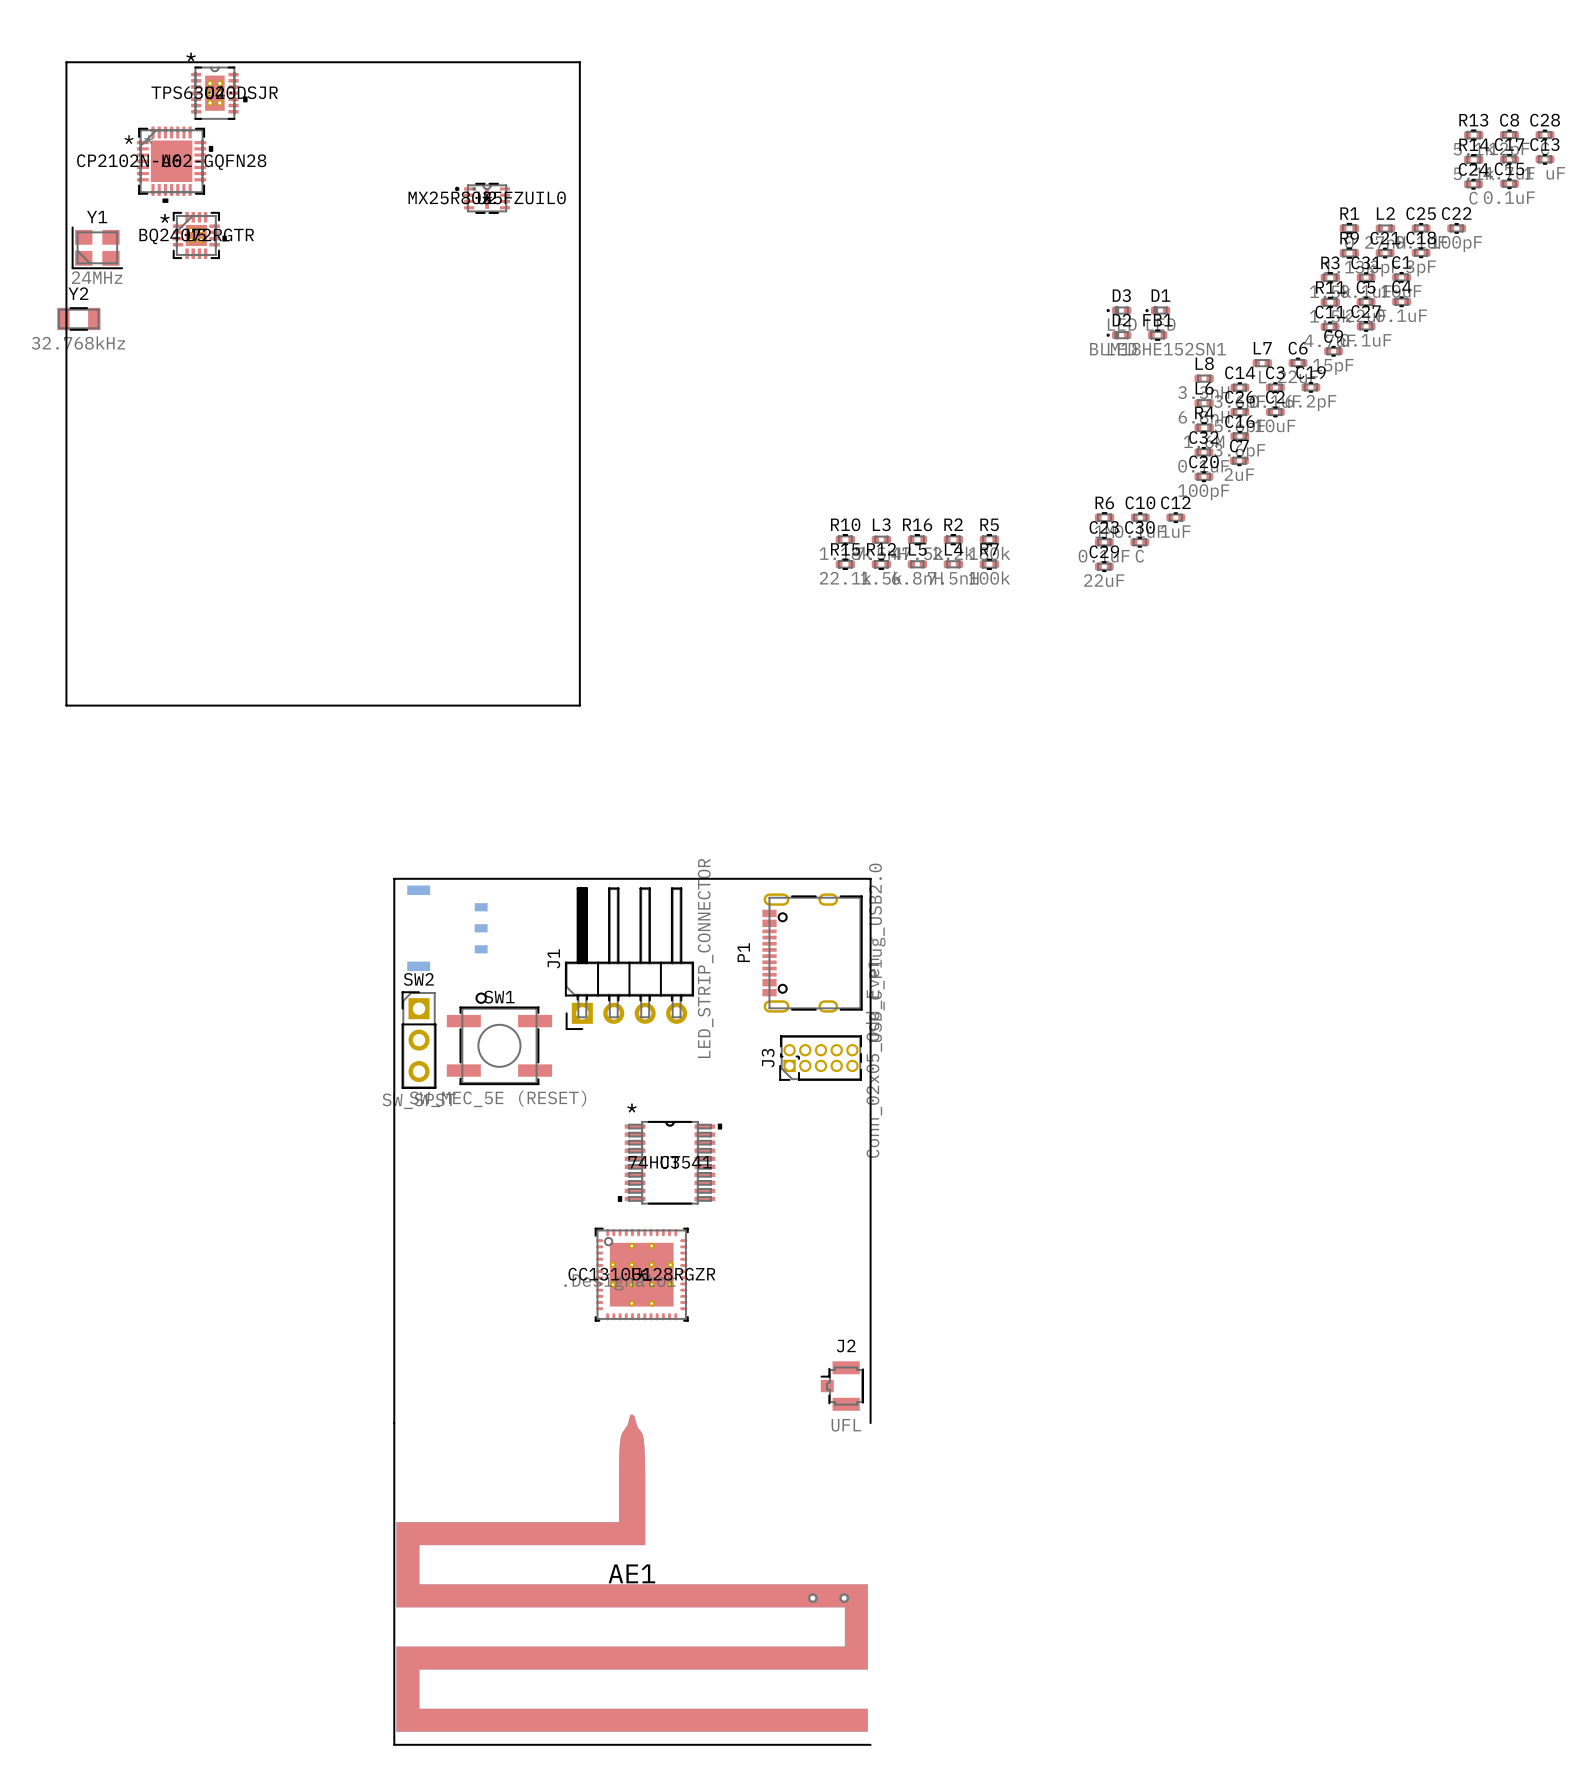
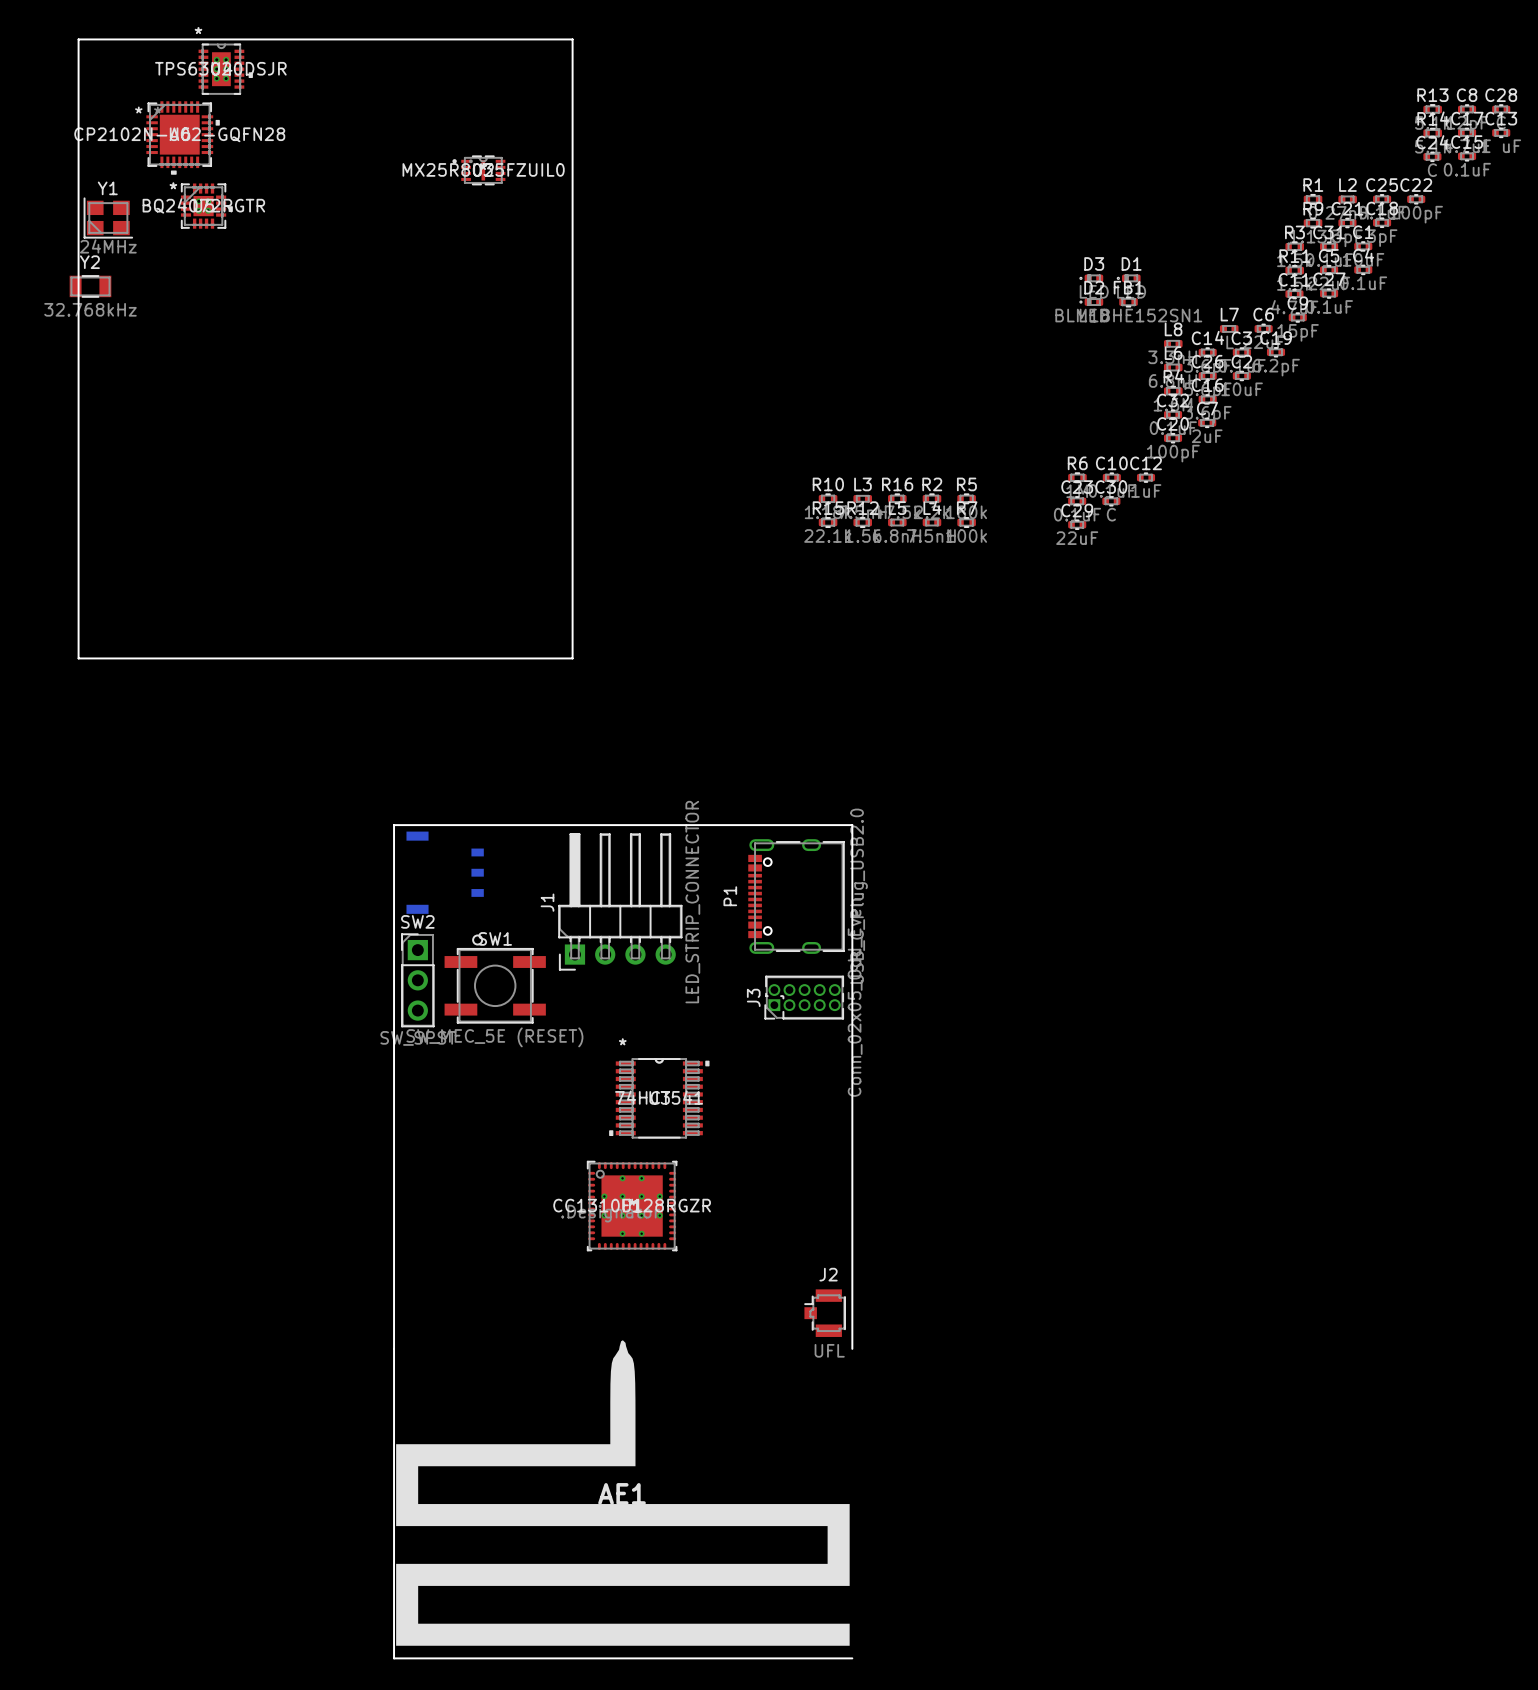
AE1 footprint: [396, 1414, 868, 1732] -> [396, 1340, 850, 1646]
via: (812, 1598) -> none
via: (844, 1598) -> none

